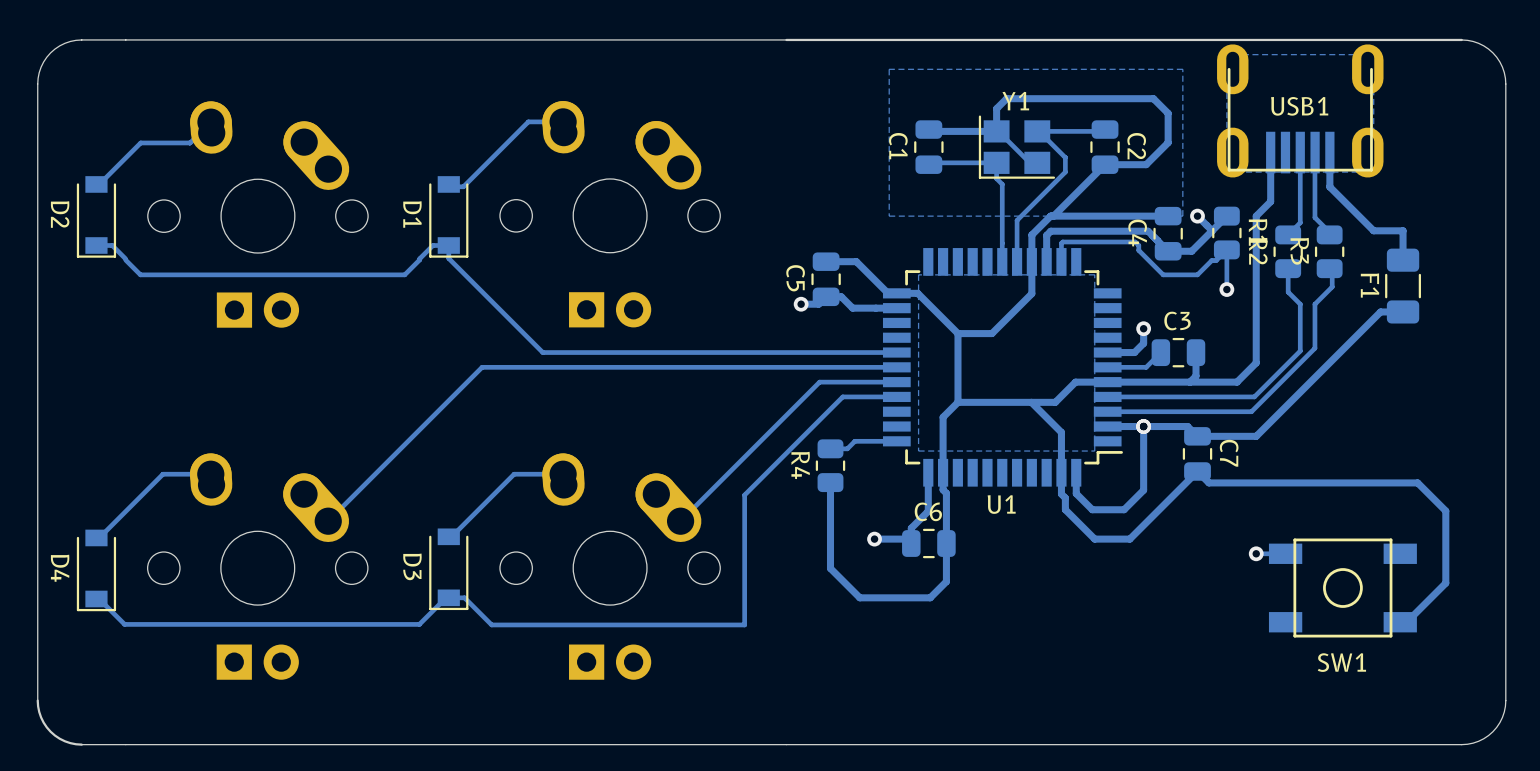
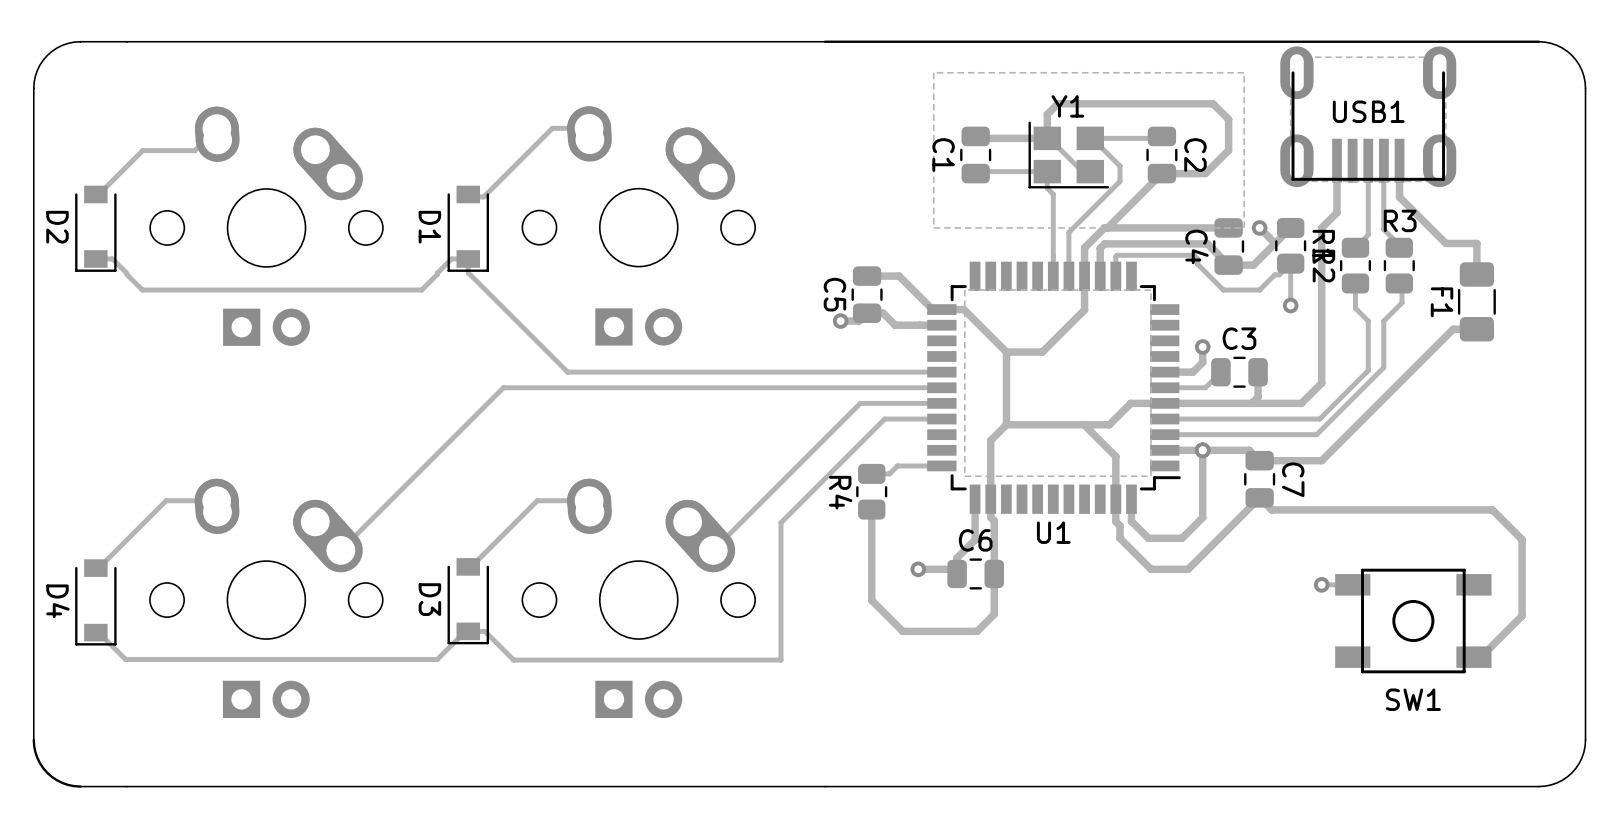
R3 name rotation: 0° (1299, 251) -> 90° counterclockwise (1400, 220)
R3 name position: R3 (1299, 251) -> R3 (1400, 220)

